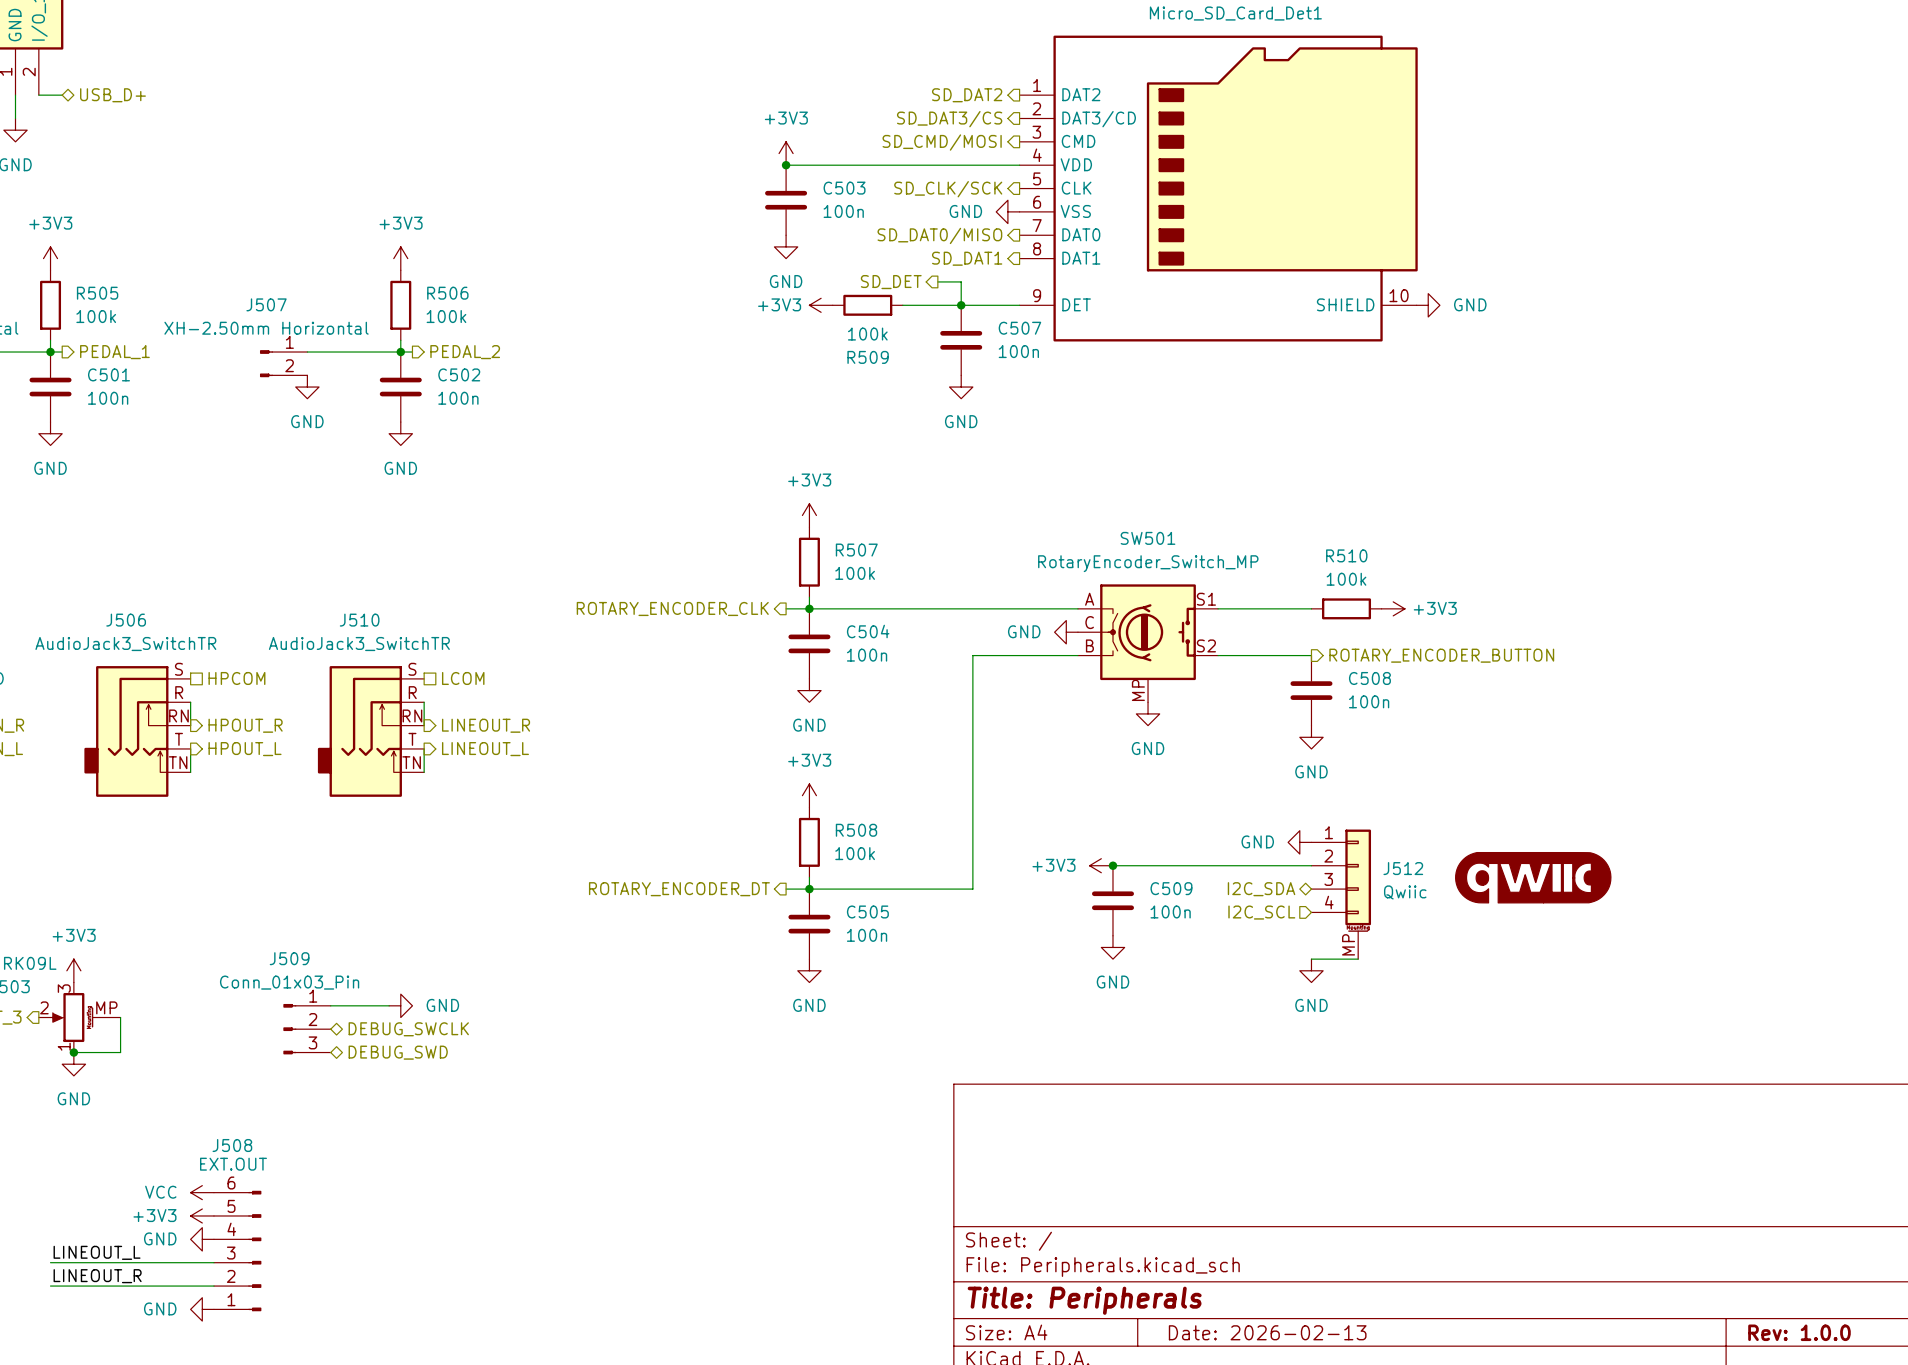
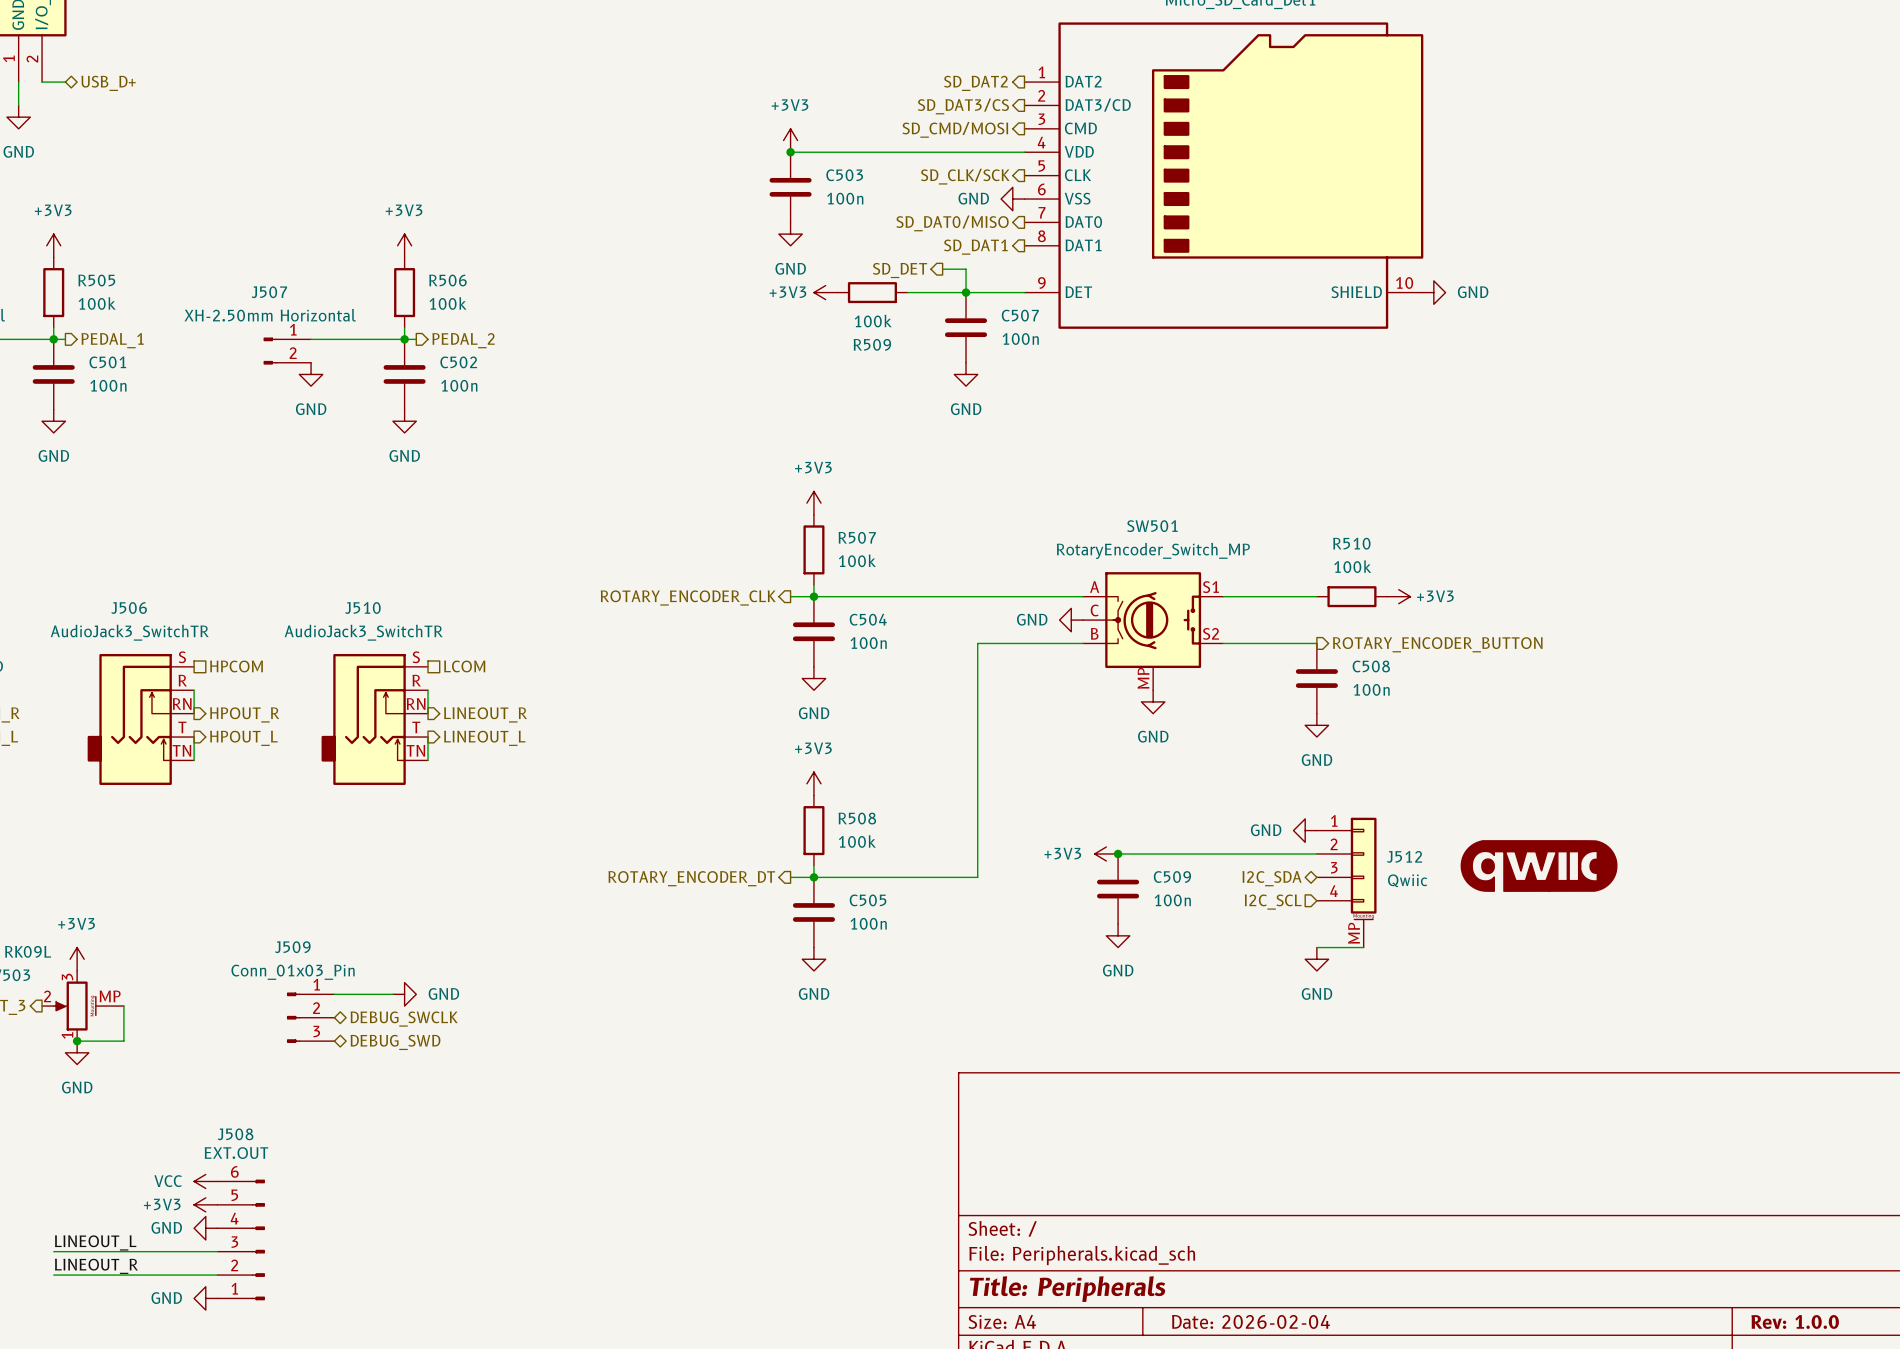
title block: Date: 2026-02-13 (1267, 1332) -> Date: 2026-02-04 (1250, 1321)

